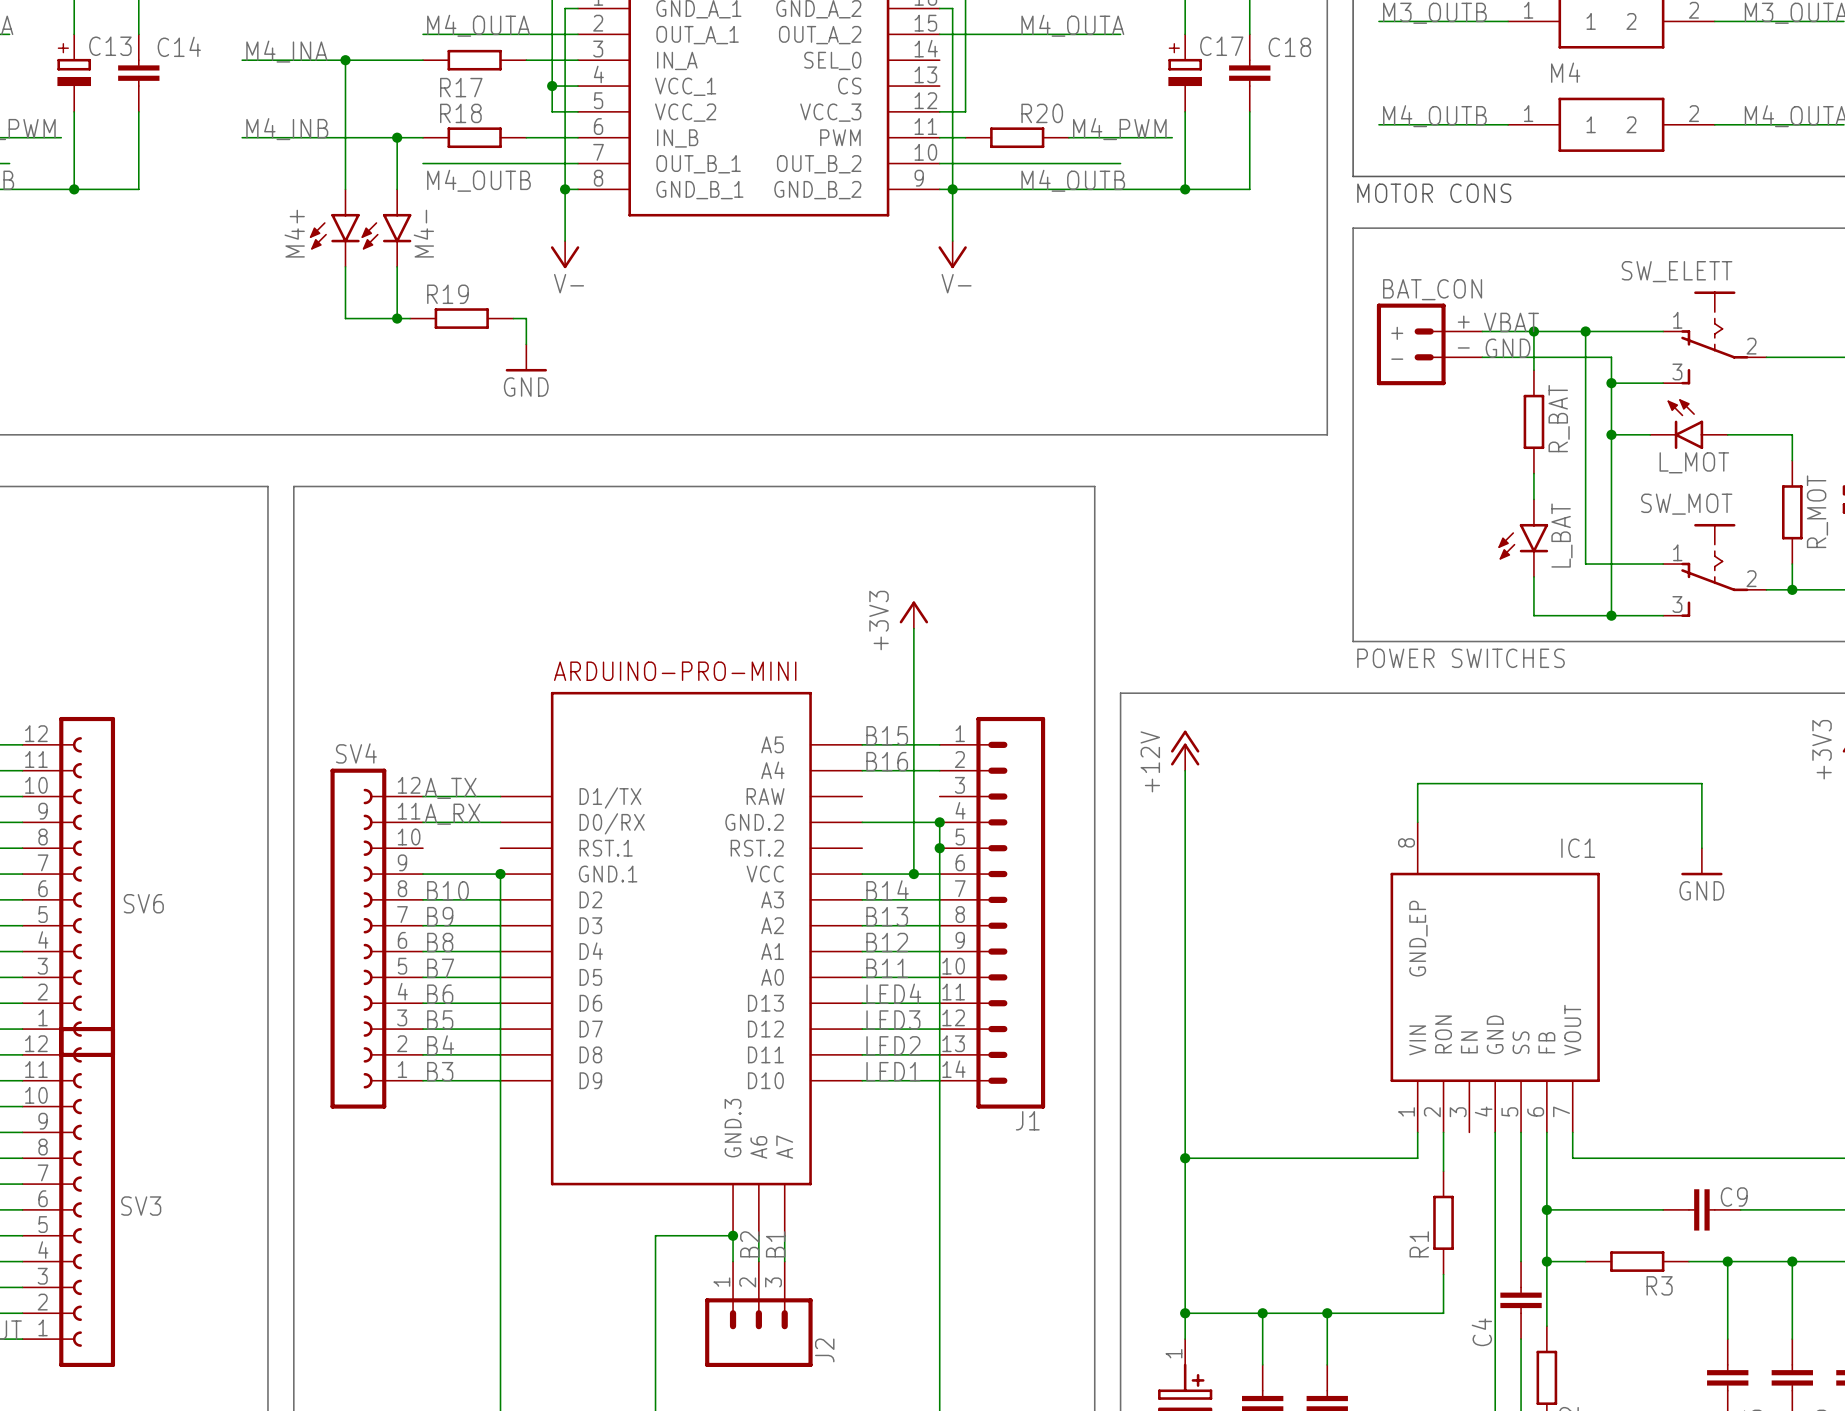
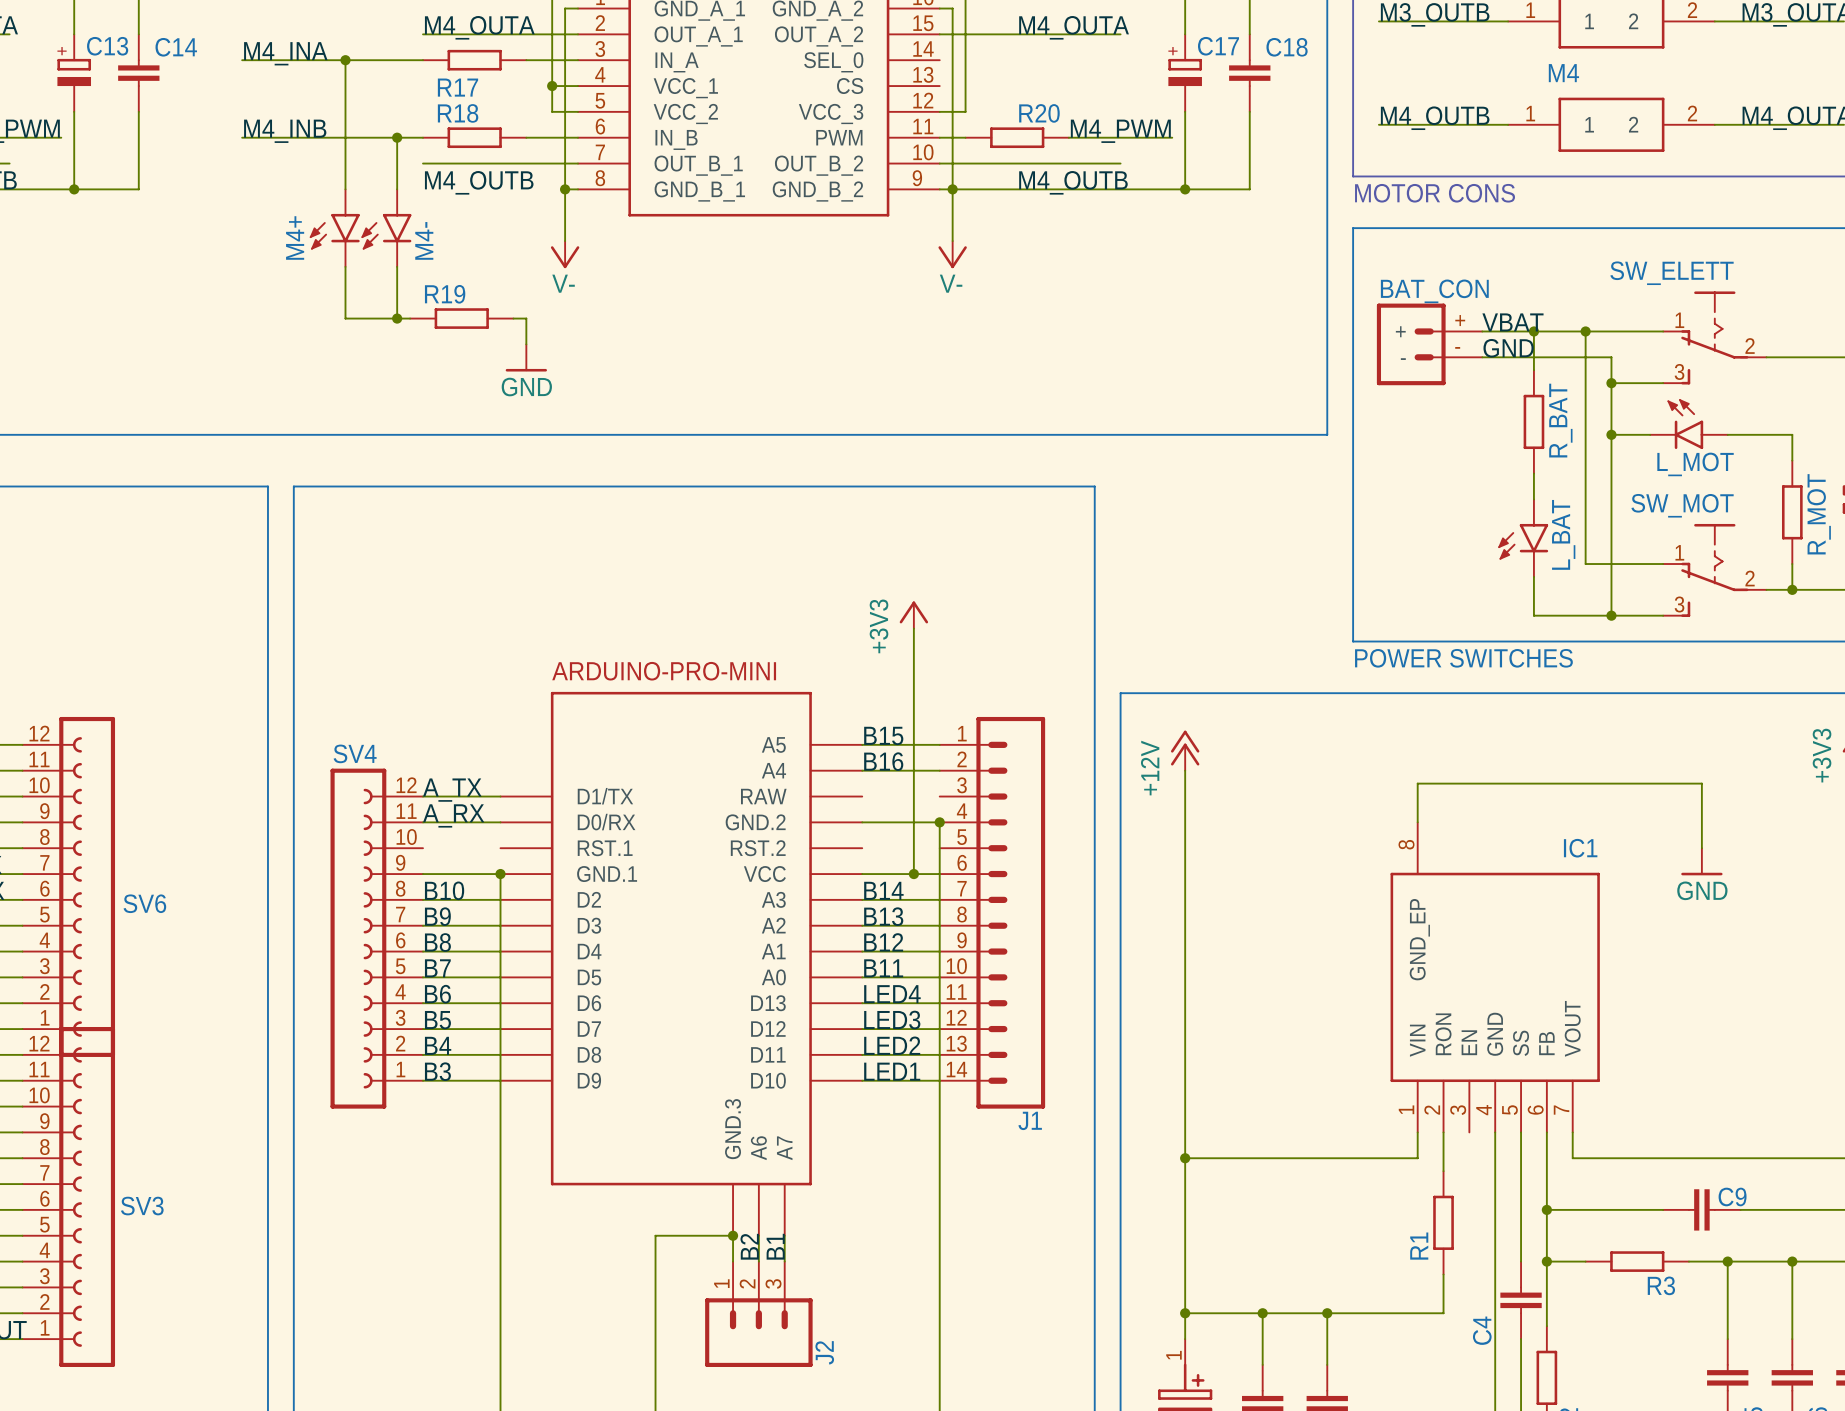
junction: (939, 848) -> none

